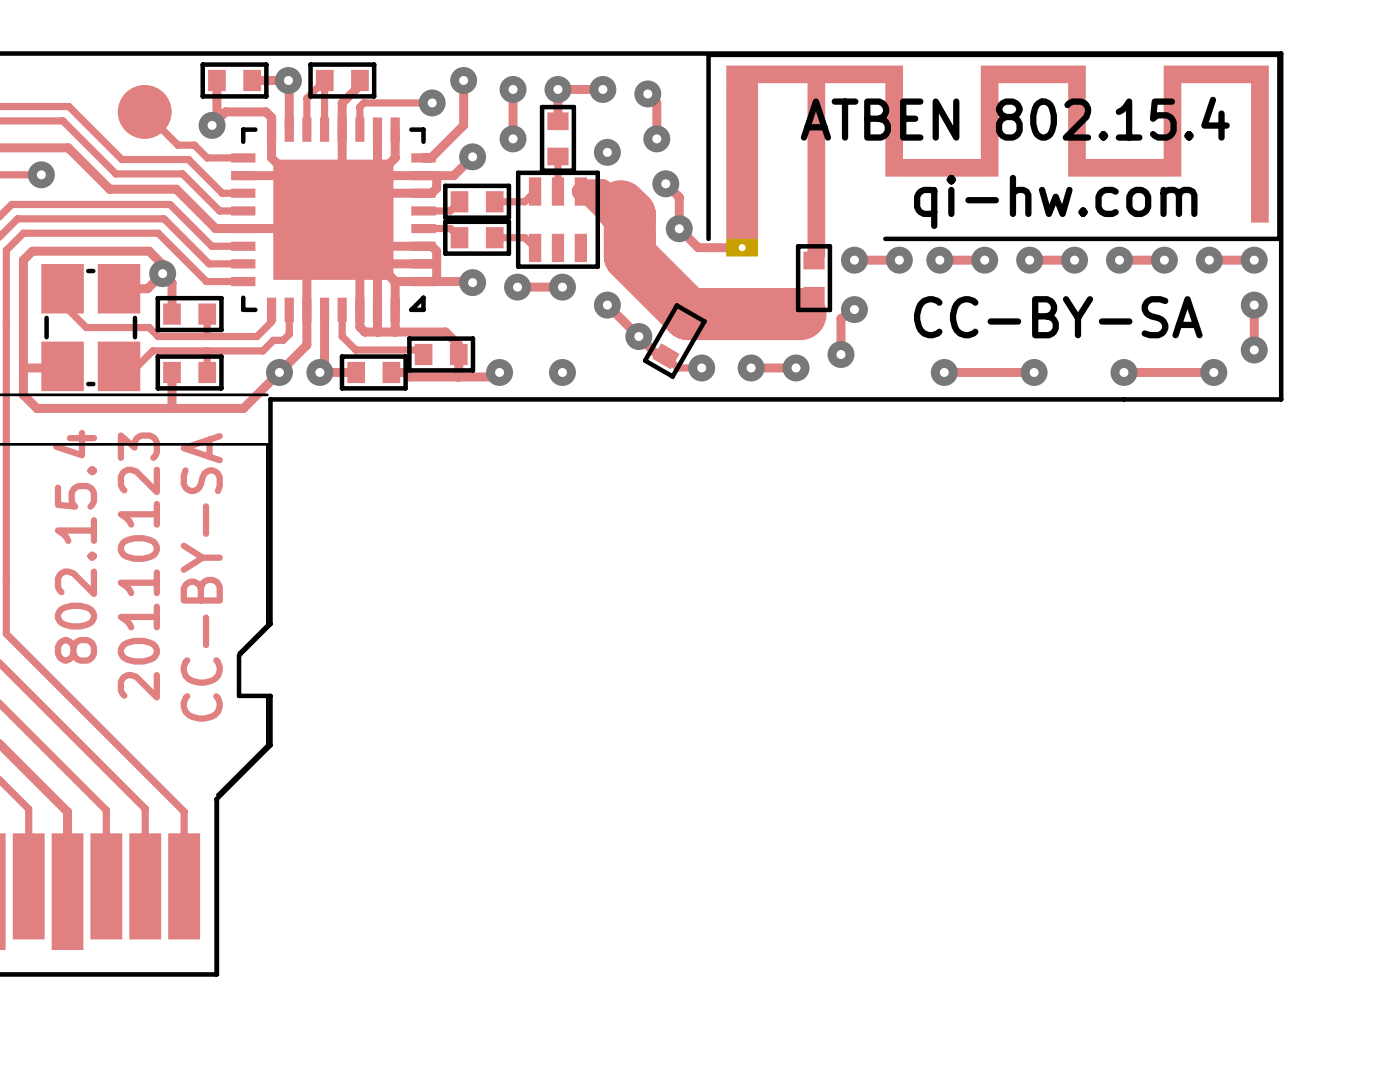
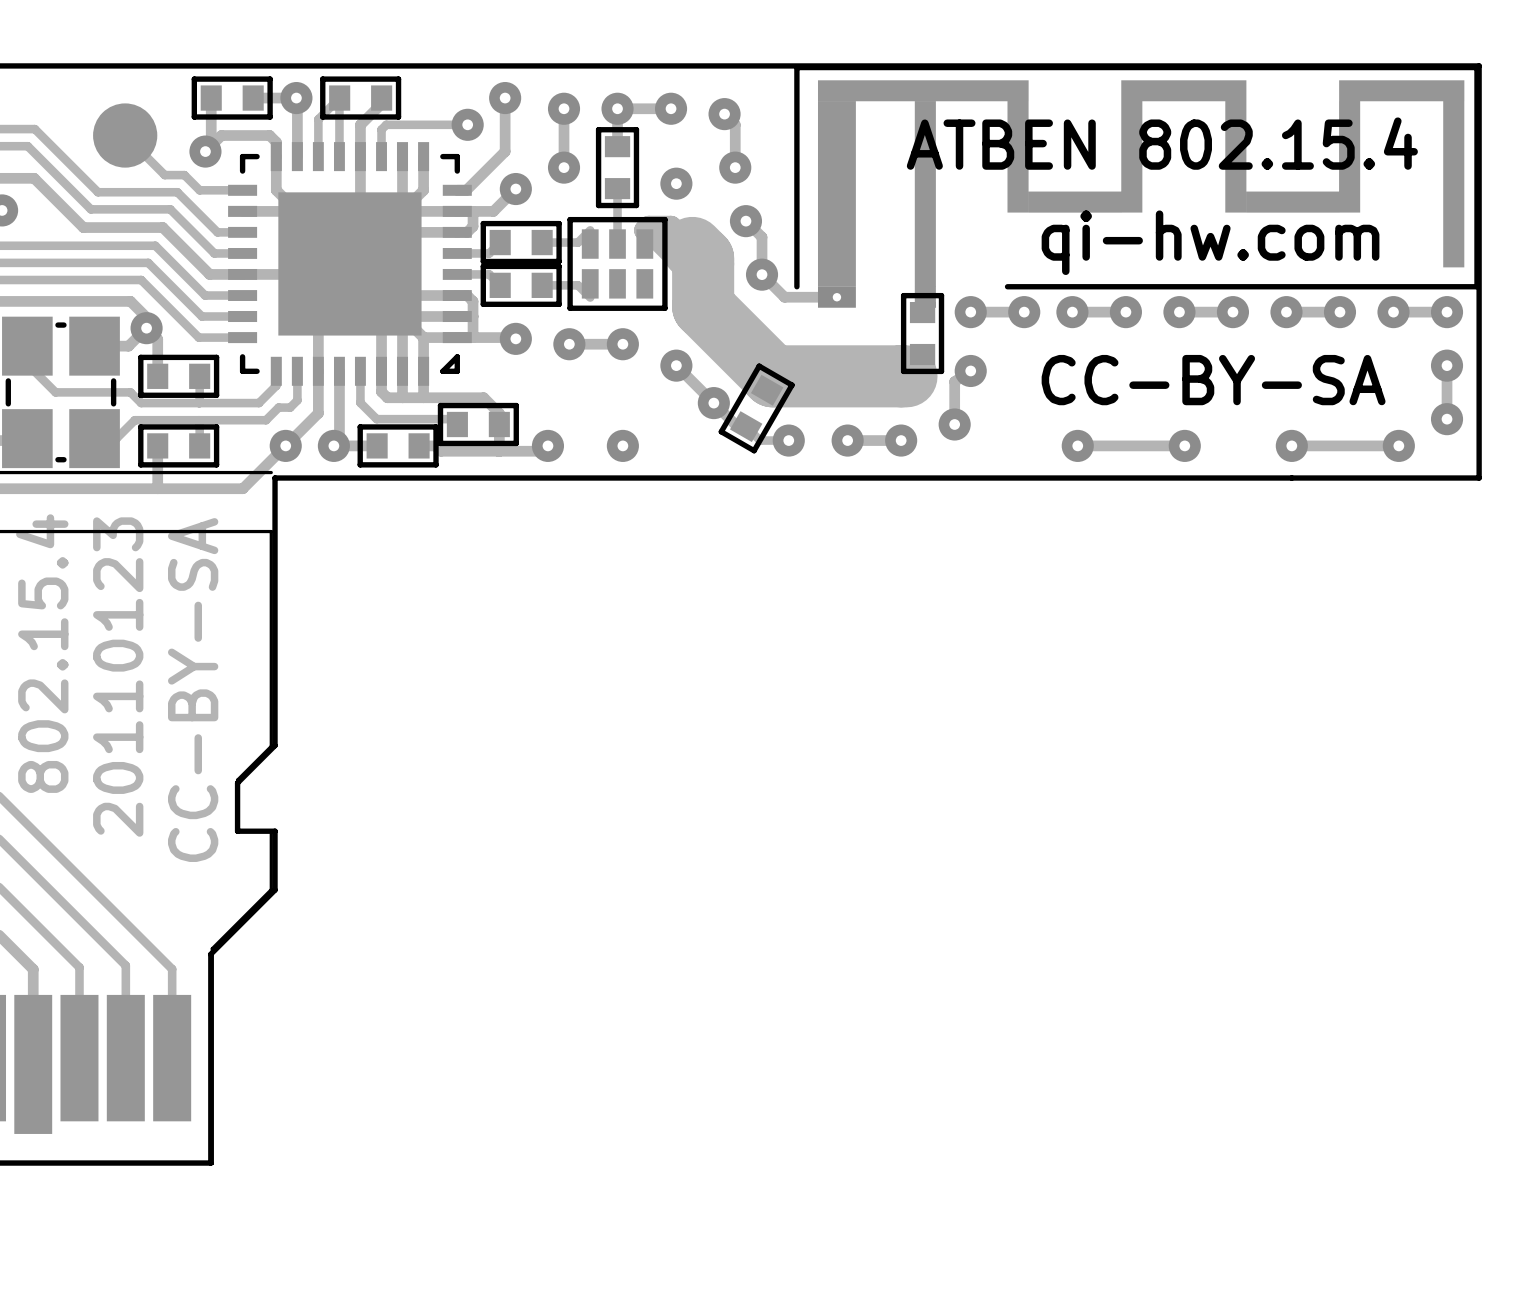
part footprint: [515, 170, 601, 269] -> [567, 216, 668, 311]

